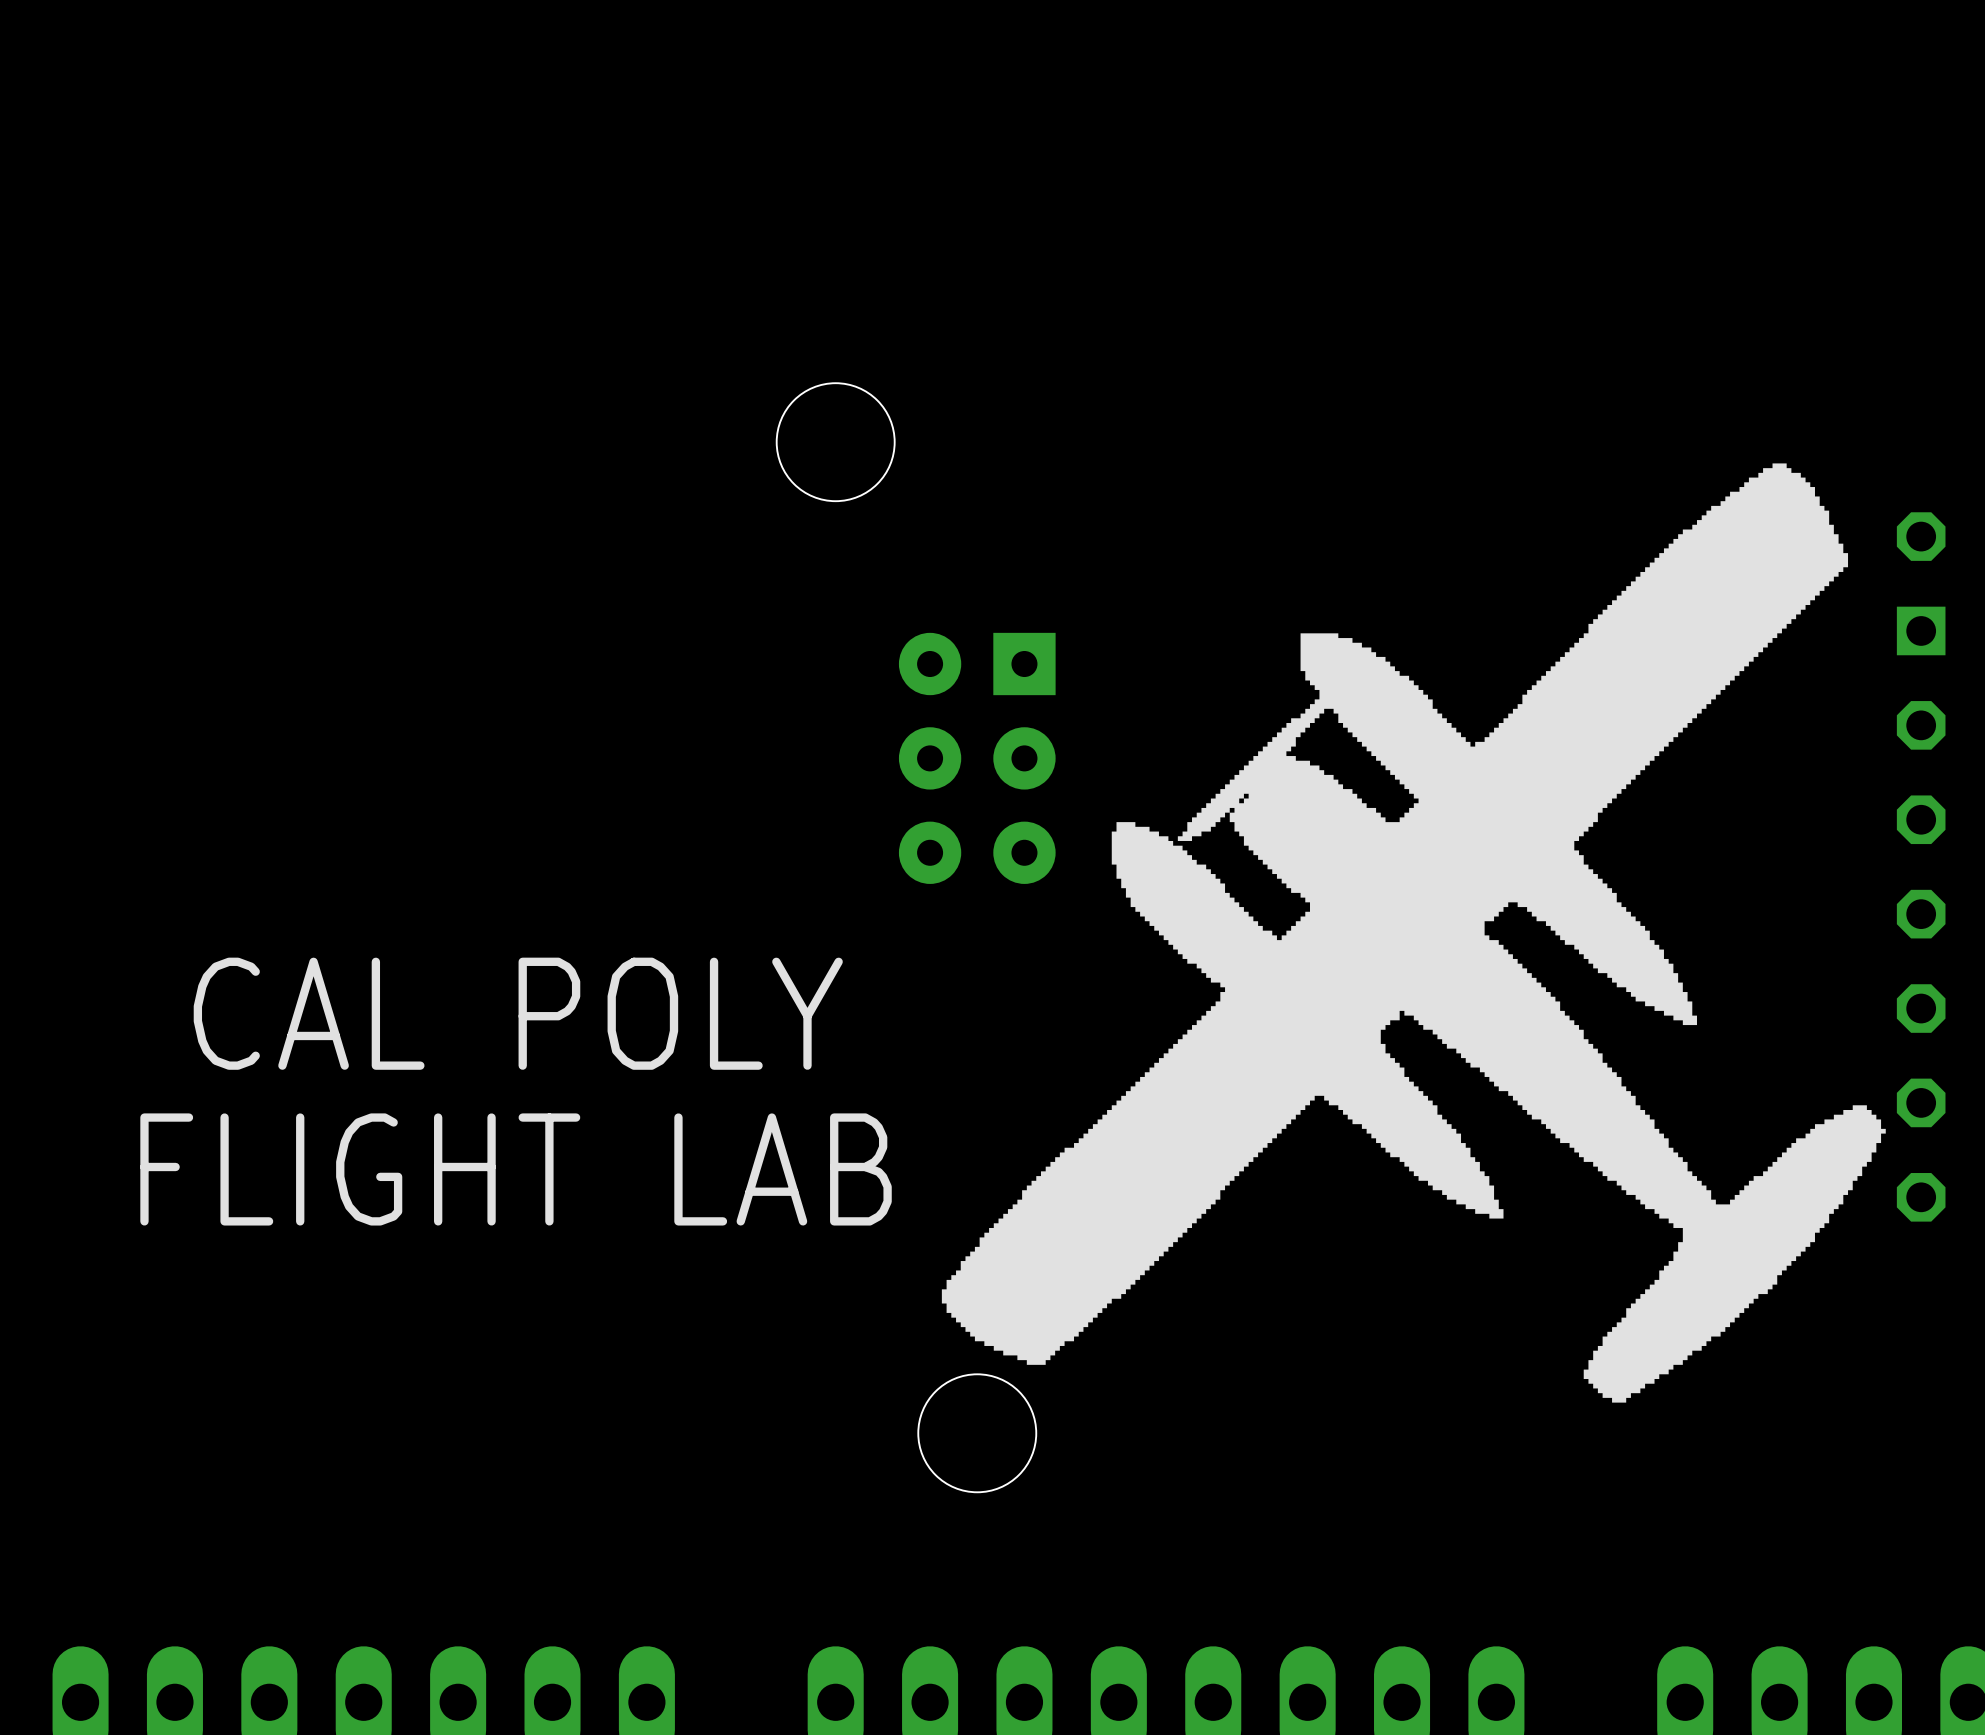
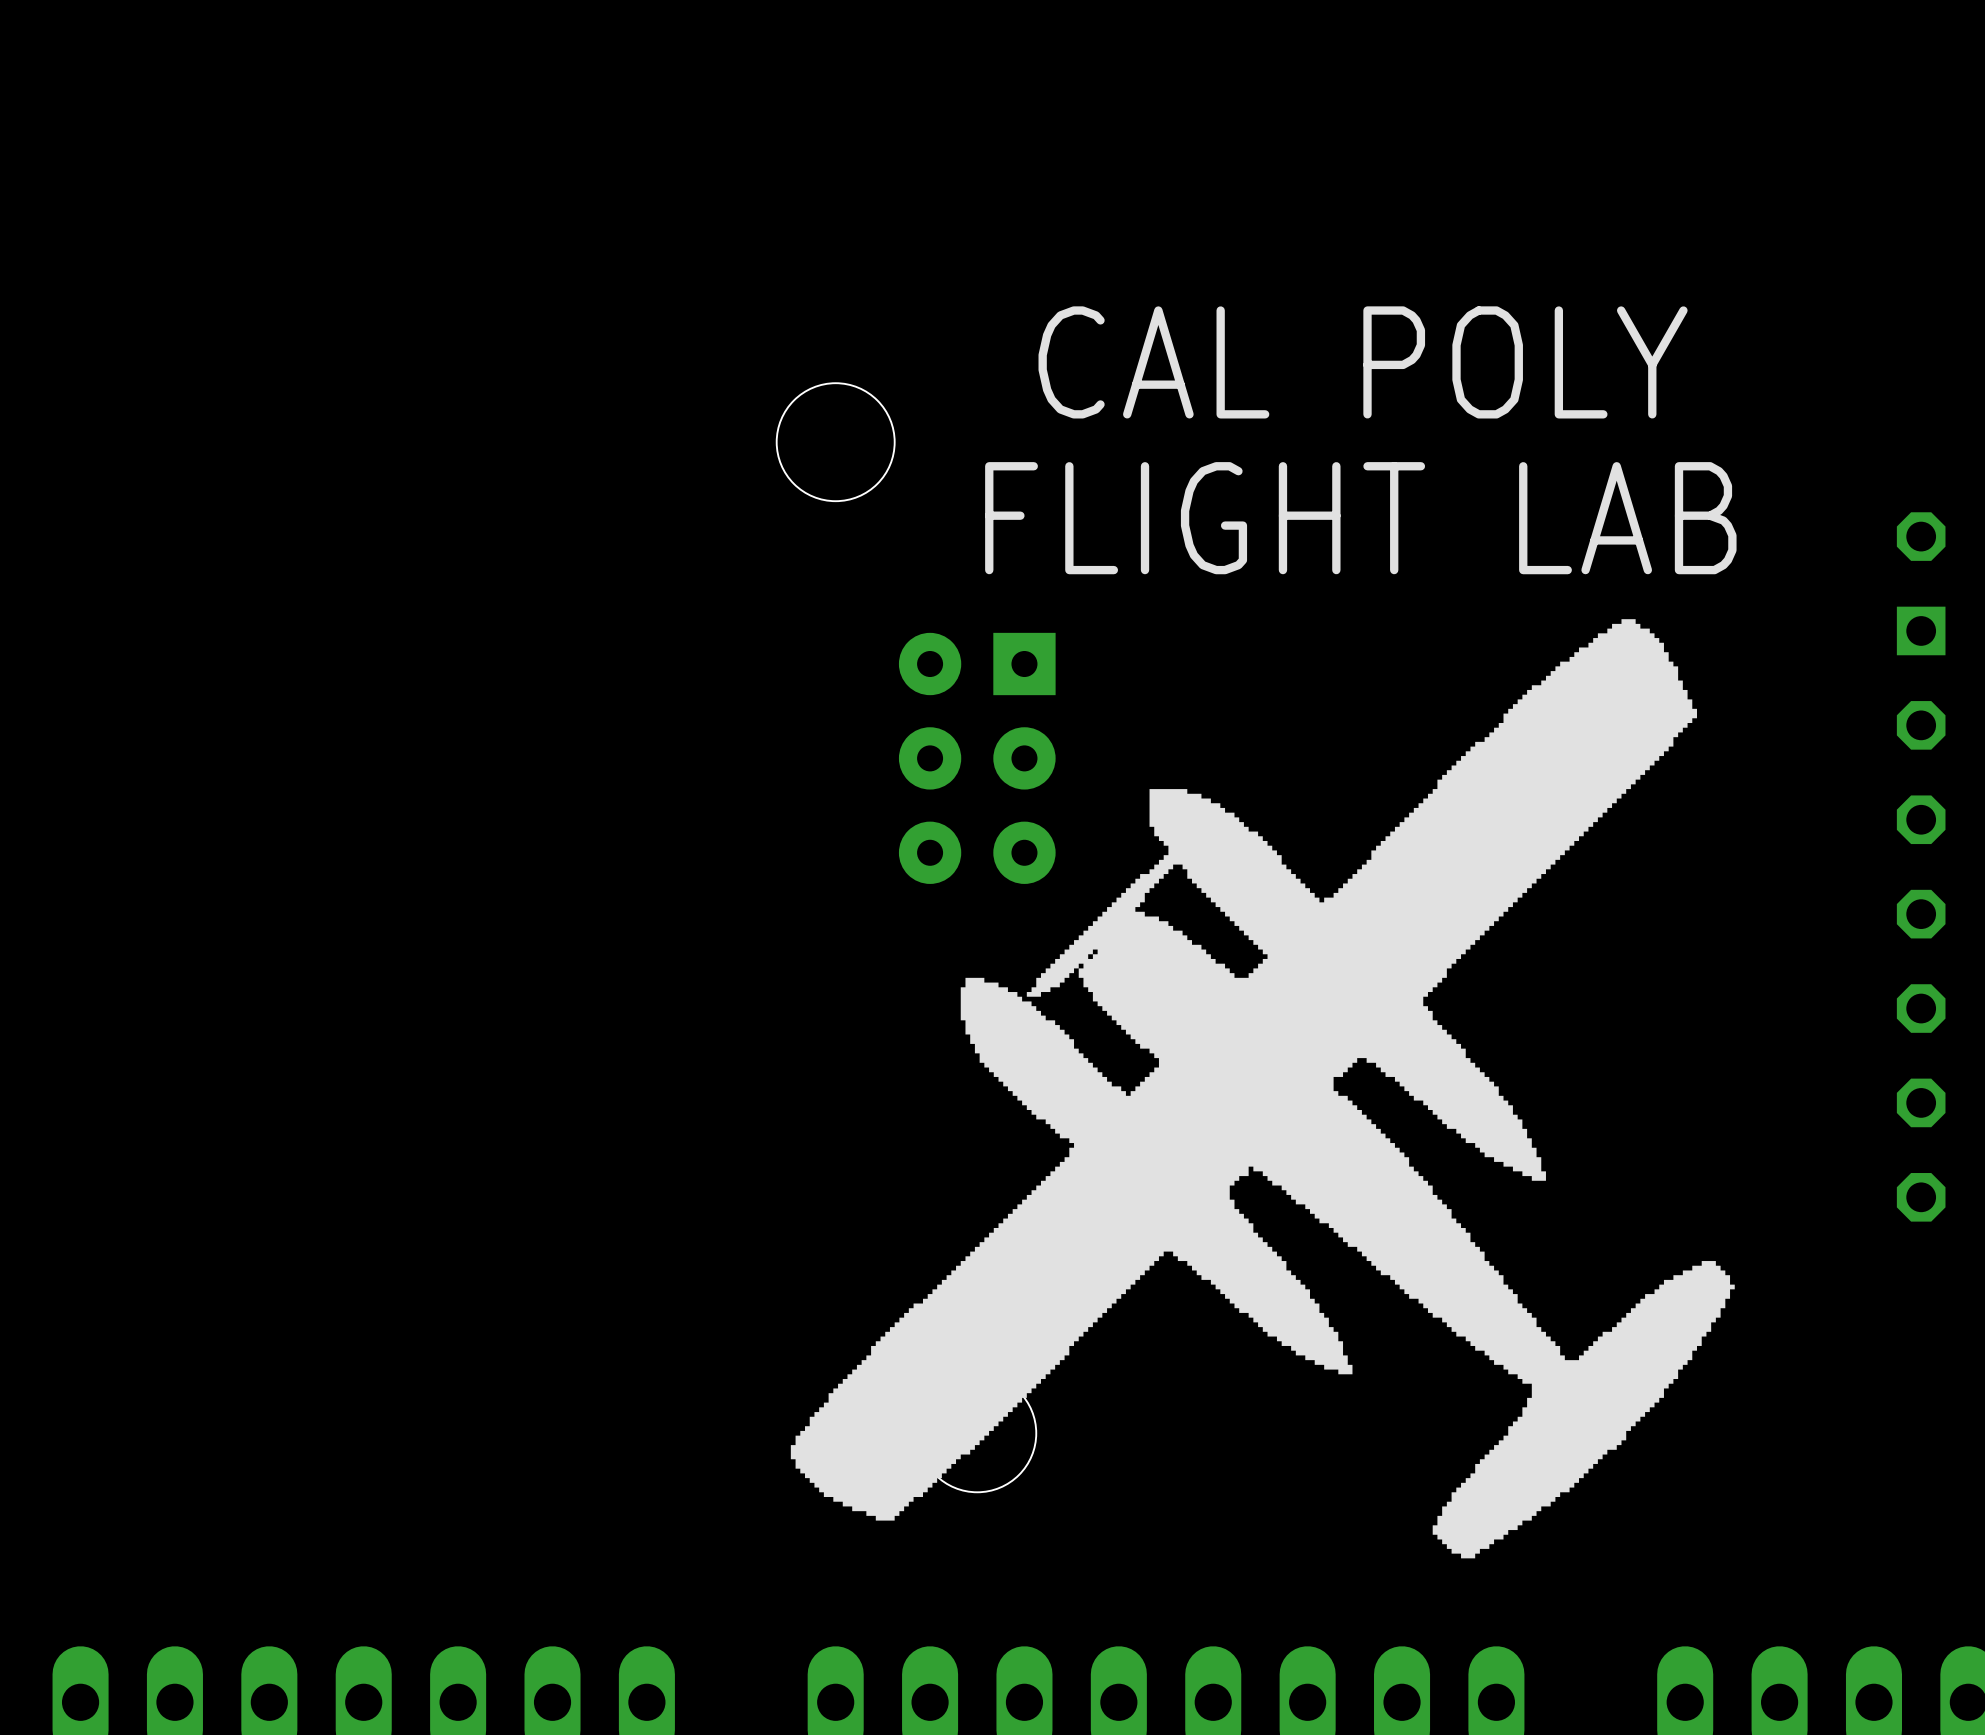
text: none -> CAL POLY (1363, 362)
drawing: [941, 463, 1886, 1403] -> none
drawing position: (1767, 508) -> (1616, 664)
text: none -> FLIGHT LAB (1360, 518)
drawing position: (1755, 541) -> (1604, 697)
drawing position: (1755, 546) -> (1604, 701)
drawing position: (1753, 550) -> (1602, 706)
drawing: none -> [790, 619, 1735, 1559]
drawing position: (1319, 635) -> (1168, 791)
drawing position: (1326, 640) -> (1175, 796)
drawing position: (1515, 772) -> (1364, 928)
drawing position: (1515, 777) -> (1364, 933)
drawing position: (1515, 781) -> (1364, 937)
drawing position: (1515, 786) -> (1364, 942)
drawing position: (1413, 824) -> (1262, 980)
drawing position: (1411, 829) -> (1260, 984)
drawing position: (1135, 833) -> (984, 989)
drawing position: (1140, 838) -> (989, 994)
drawing position: (1184, 838) -> (1033, 994)
drawing position: (1147, 848) -> (1184, 805)
drawing position: (1161, 866) -> (1194, 819)
drawing shape: [1281, 878, 1603, 884] -> [1347, 878, 1537, 884]
drawing position: (1458, 895) -> (1307, 1051)
drawing position: (1461, 899) -> (1309, 1055)
drawing shape: [1309, 902, 1509, 908] -> [1324, 897, 1518, 903]
drawing position: (1385, 937) -> (1234, 1093)
drawing position: (1385, 1008) -> (1234, 1164)
drawing position: (1673, 1008) -> (1522, 1164)
text: CAL POLY (518, 1013) -> none
drawing position: (1685, 1017) -> (1534, 1173)
drawing position: (1276, 1051) -> (1125, 1206)
drawing position: (1276, 1055) -> (1125, 1211)
drawing position: (1276, 1060) -> (1125, 1216)
drawing position: (1276, 1065) -> (1125, 1220)
drawing position: (1276, 1069) -> (1125, 1225)
text: FLIGHT LAB (516, 1169) -> none
drawing position: (1468, 1192) -> (1510, 1154)
drawing position: (1470, 1197) -> (1517, 1159)
drawing position: (1741, 1206) -> (1590, 1362)
drawing position: (1489, 1211) -> (1527, 1168)
drawing position: (1744, 1211) -> (1593, 1367)
drawing position: (1496, 1216) -> (1538, 1178)
drawing position: (1744, 1216) -> (1593, 1371)
drawing position: (1031, 1296) -> (880, 1452)
drawing position: (1026, 1301) -> (875, 1456)
drawing position: (1026, 1348) -> (875, 1504)
drawing position: (1642, 1353) -> (1661, 1329)

